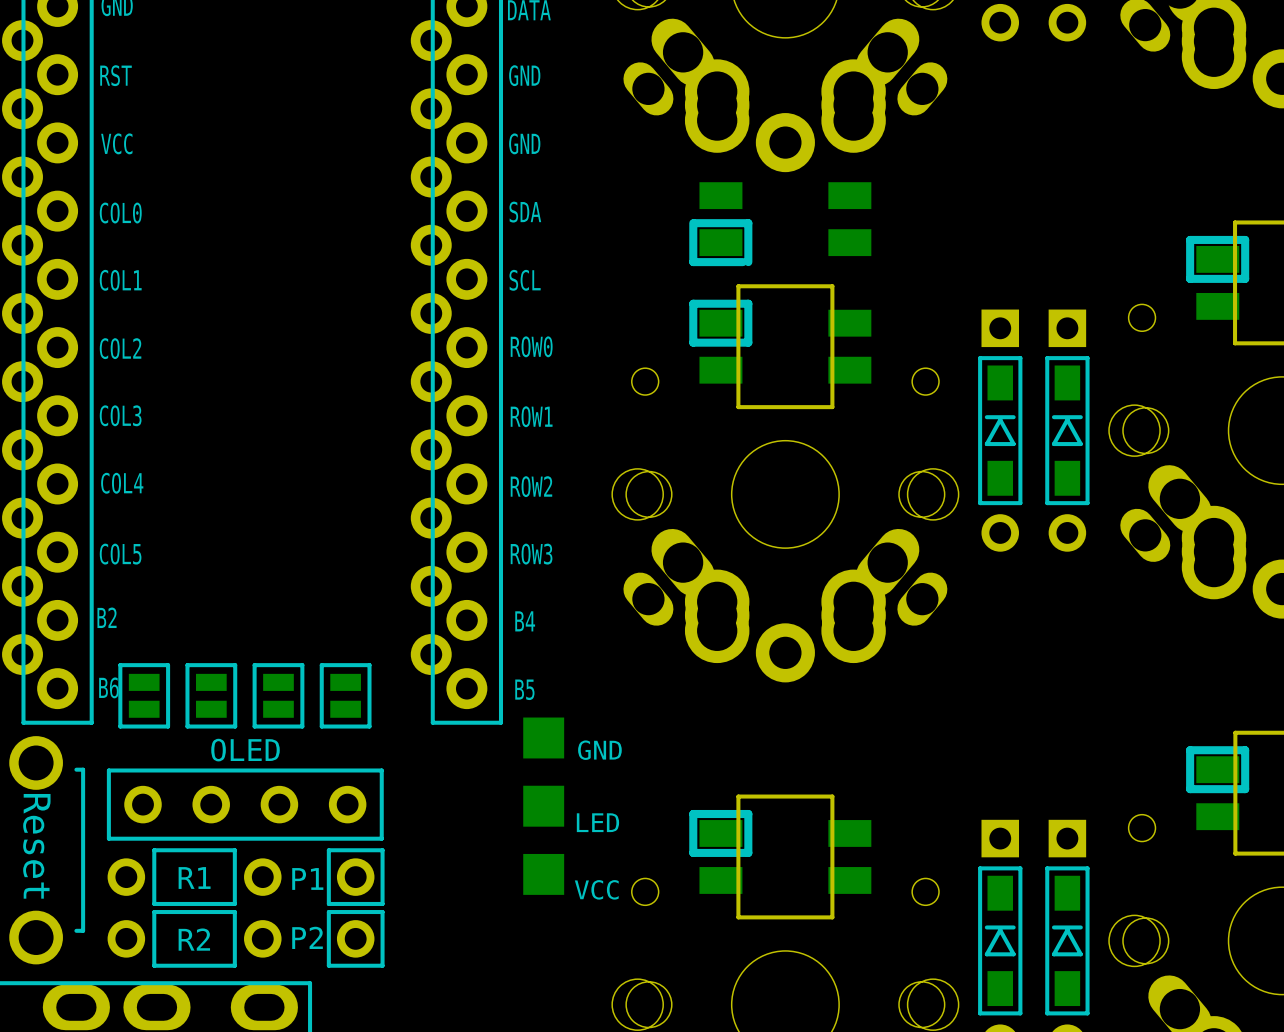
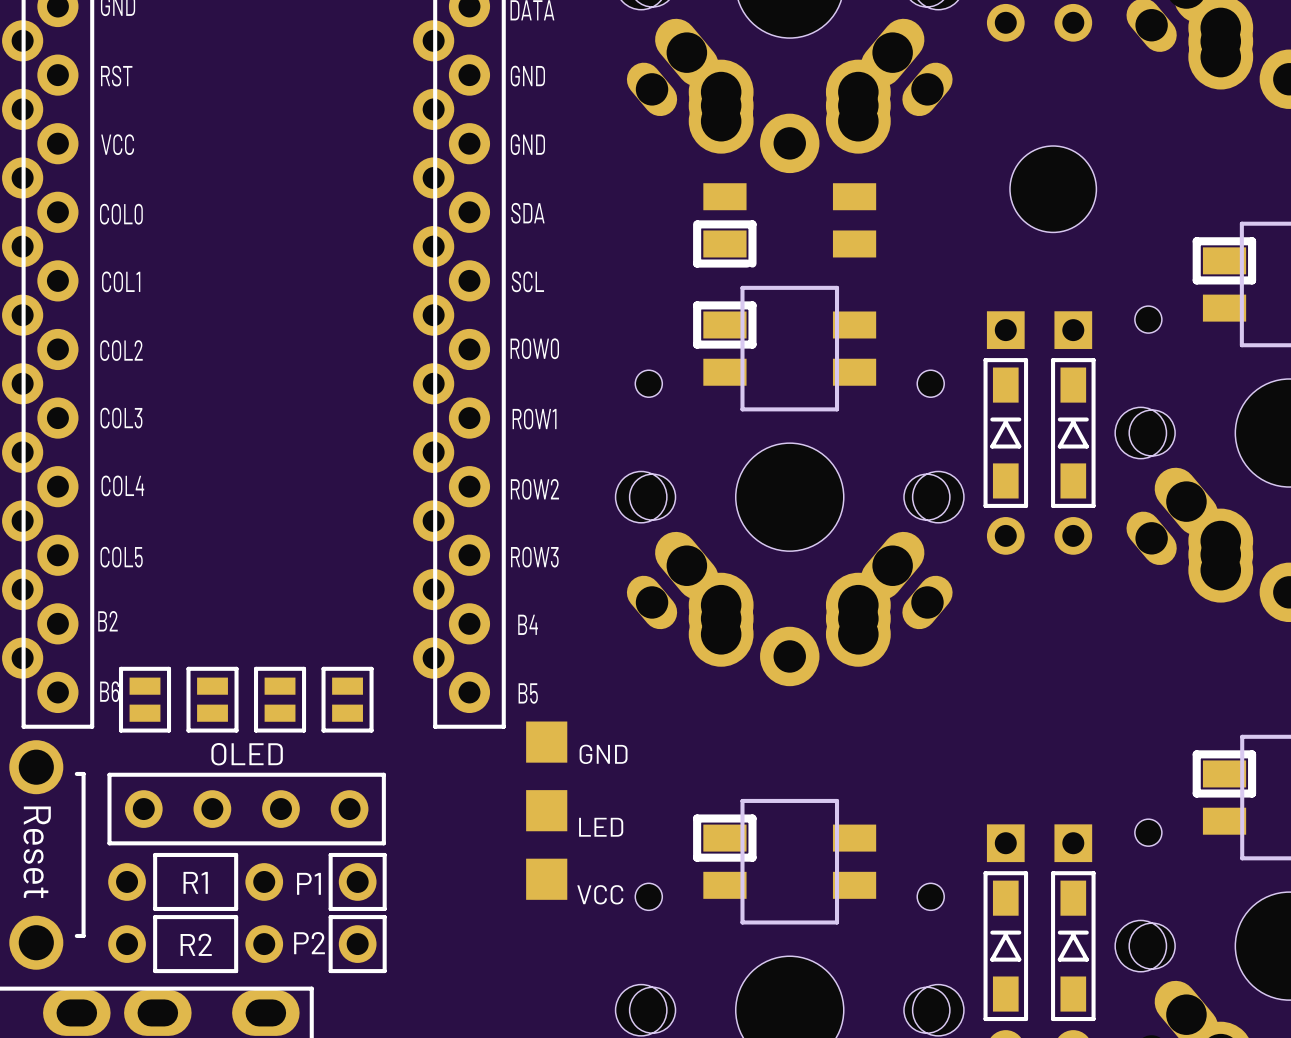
part: none -> (1053, 189)

